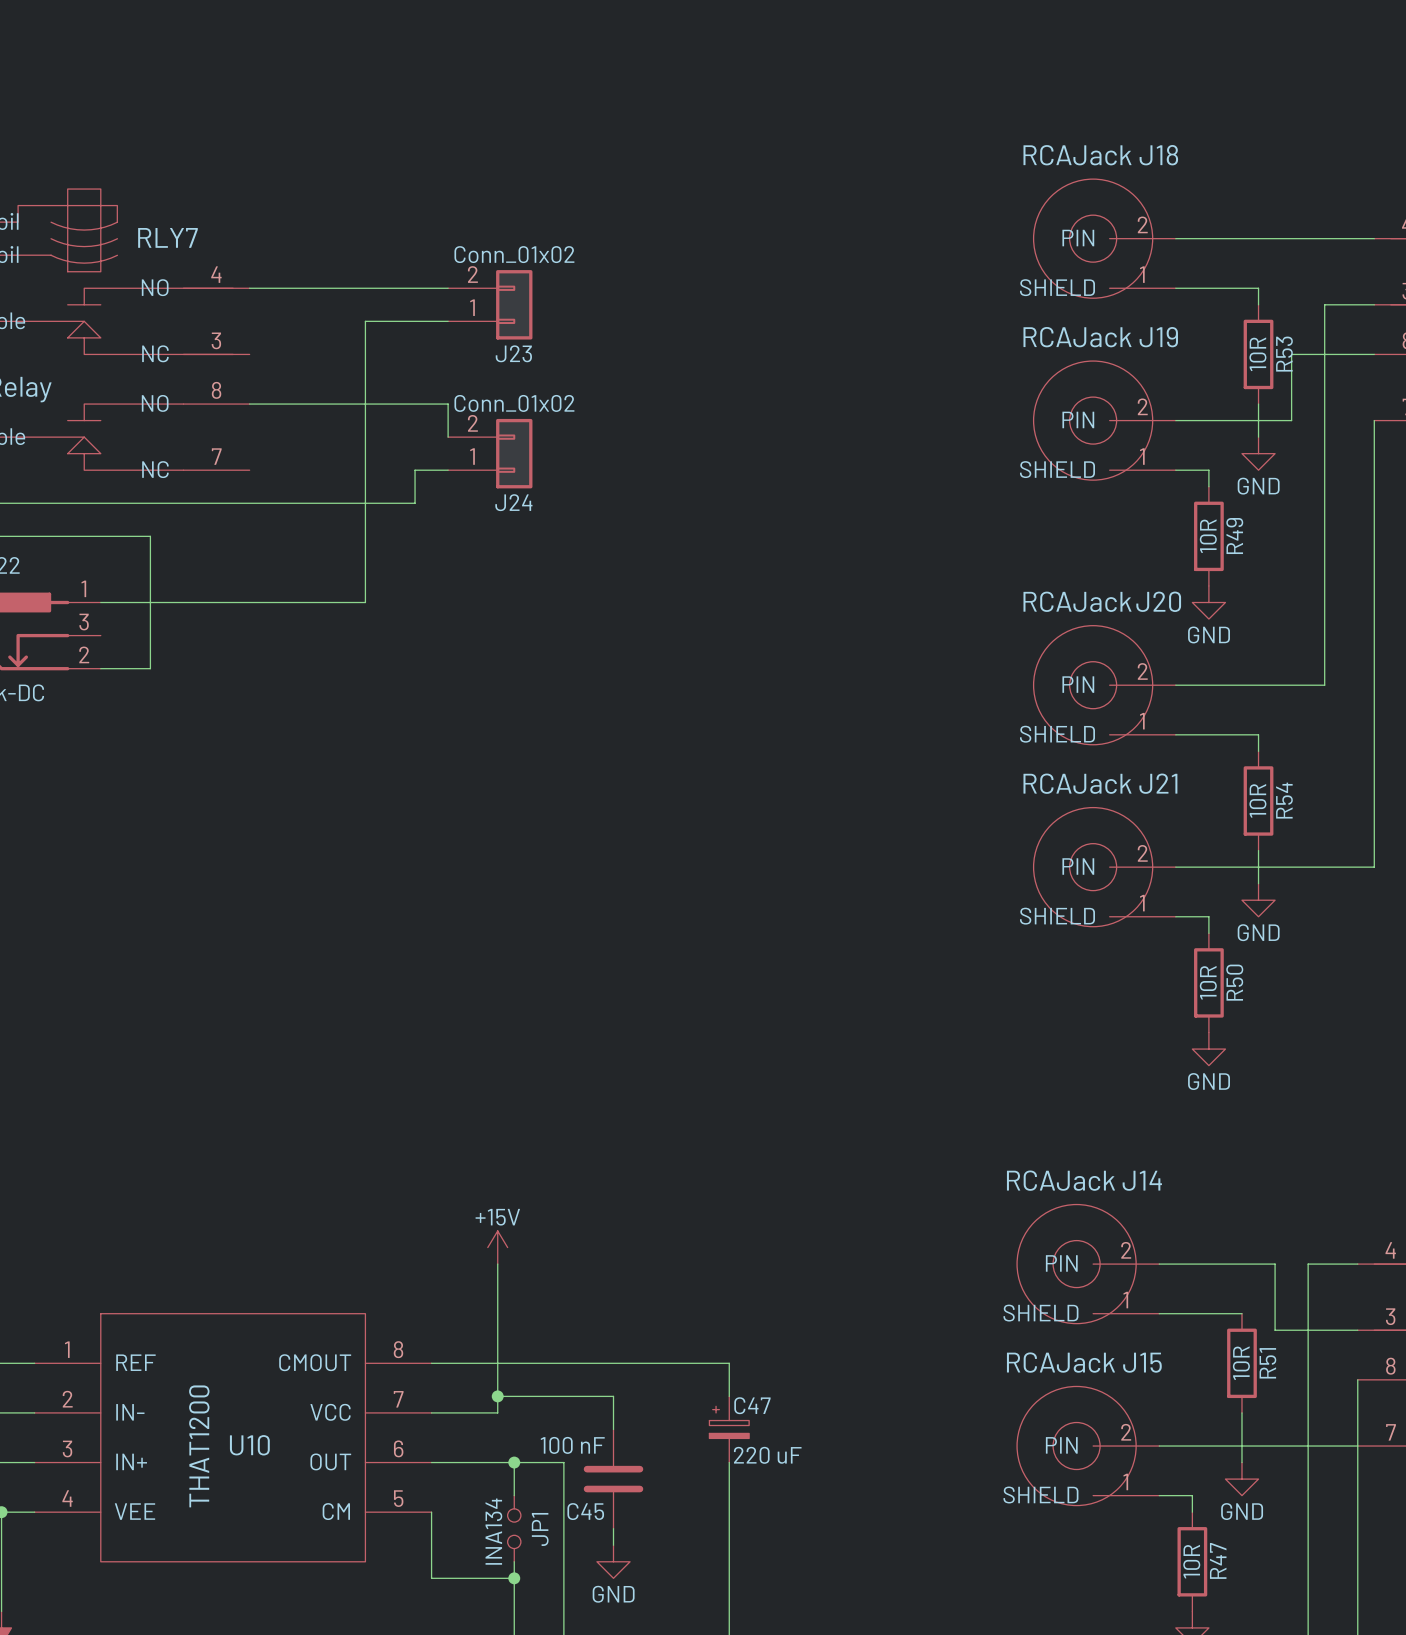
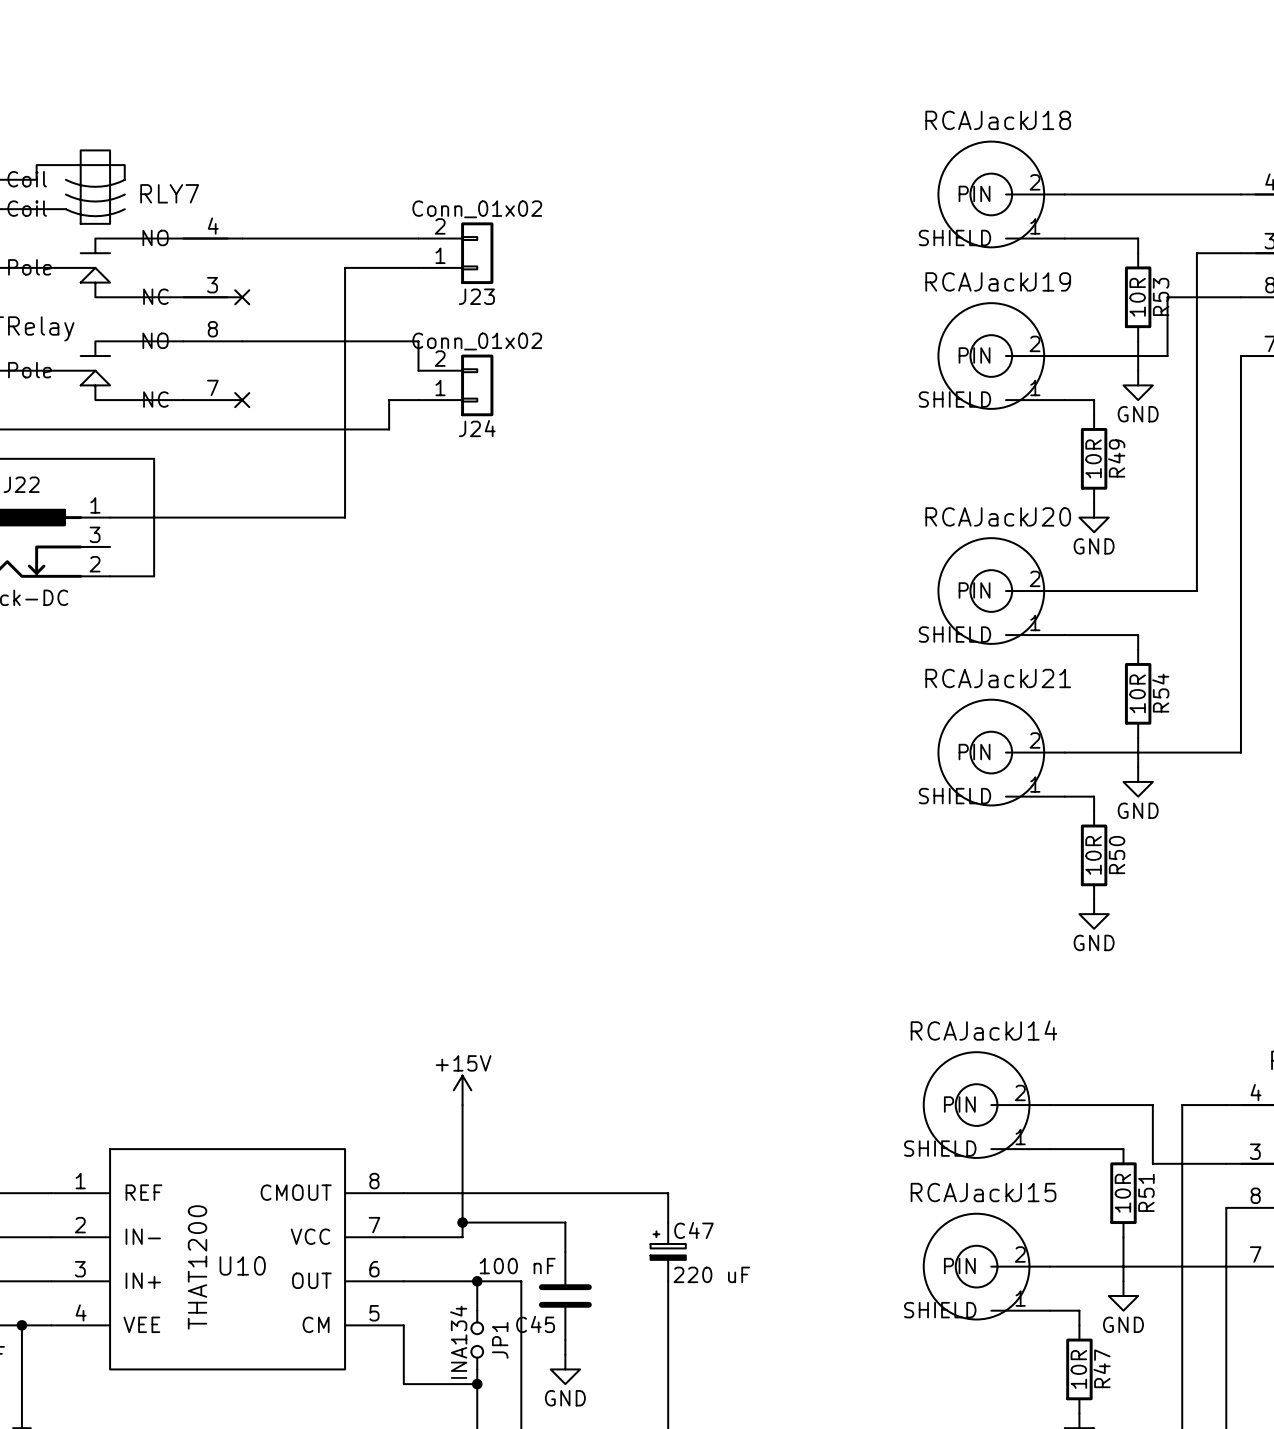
no-connect mark: none -> (242, 297)
no-connect mark: none -> (242, 400)

